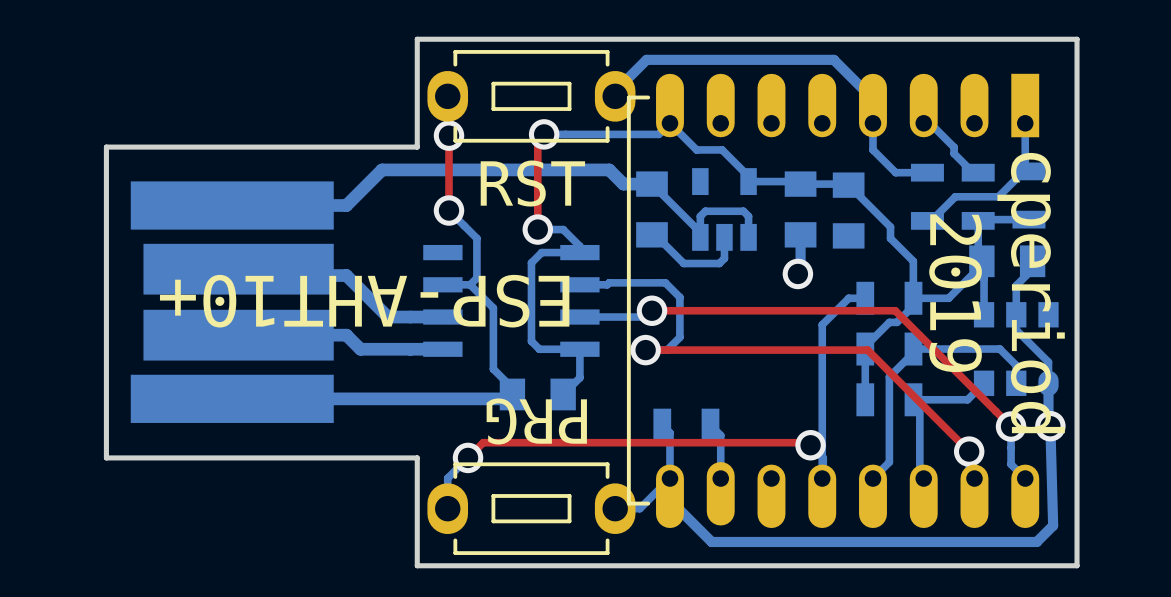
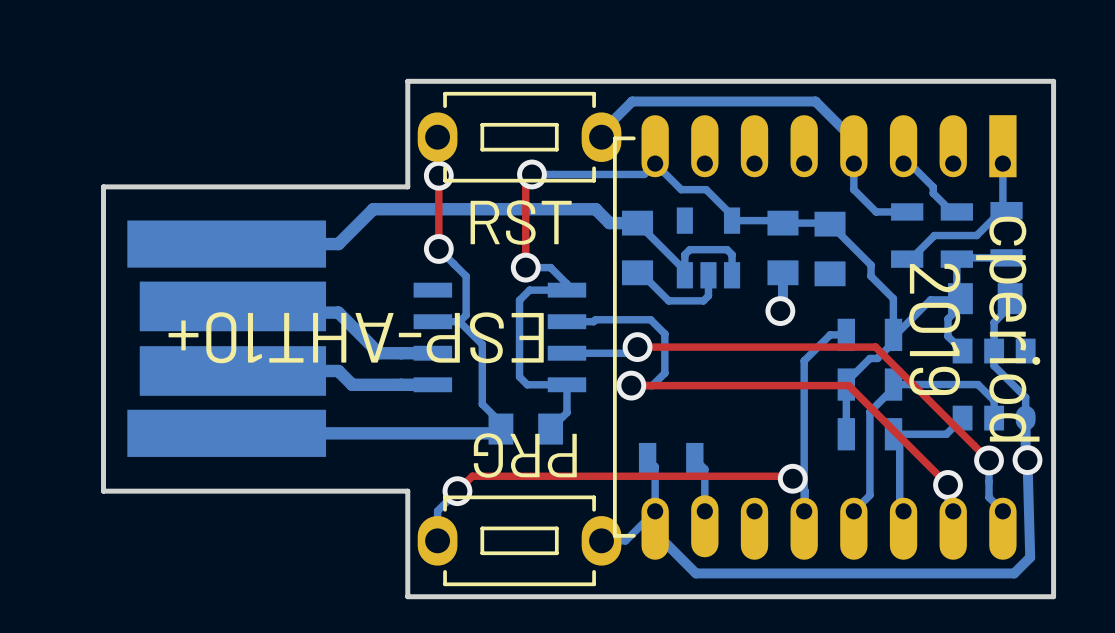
bottom track: none -> (956, 310) (948, 318) (948, 336) (962, 351)
bottom track: (915, 298) (948, 298) (974, 272) (978, 272) (984, 278) (984, 314) -> (895, 334) (930, 299) (955, 299)

